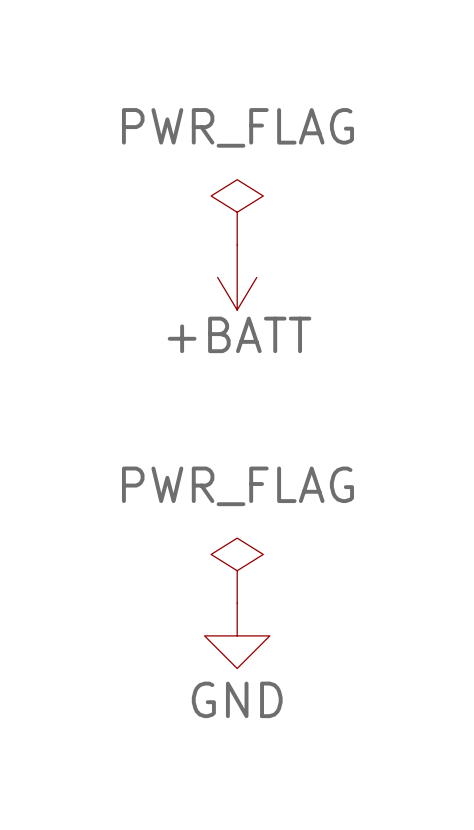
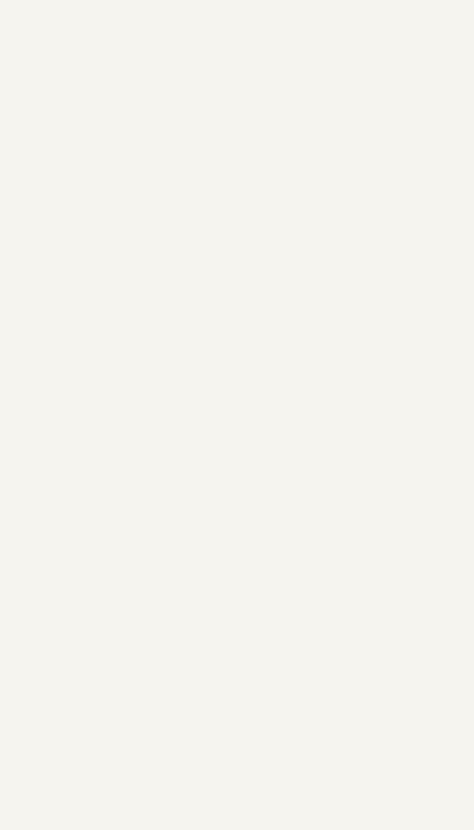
power symbol: PWR_FLAG (237, 212) -> none
power symbol: +BATT (237, 277) -> none
power symbol: PWR_FLAG (237, 570) -> none
power symbol: GND (237, 635) -> none

